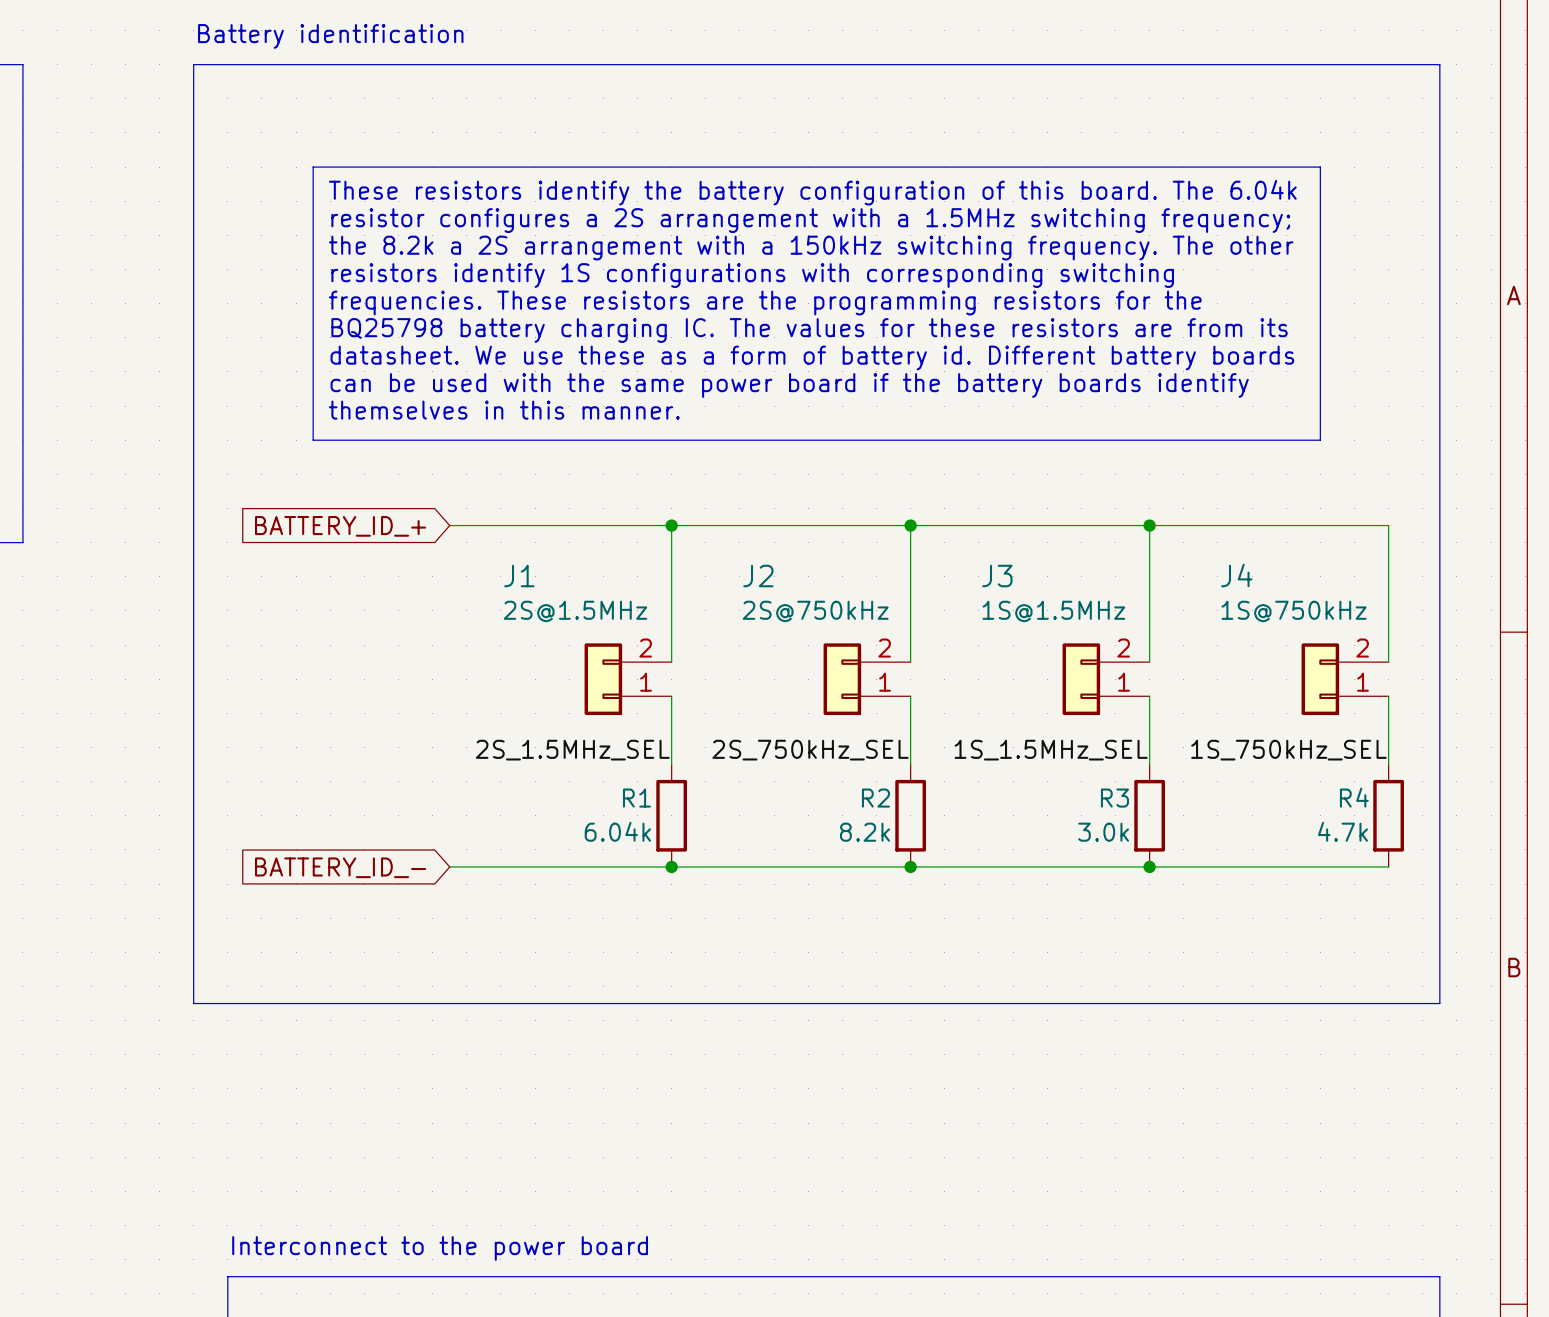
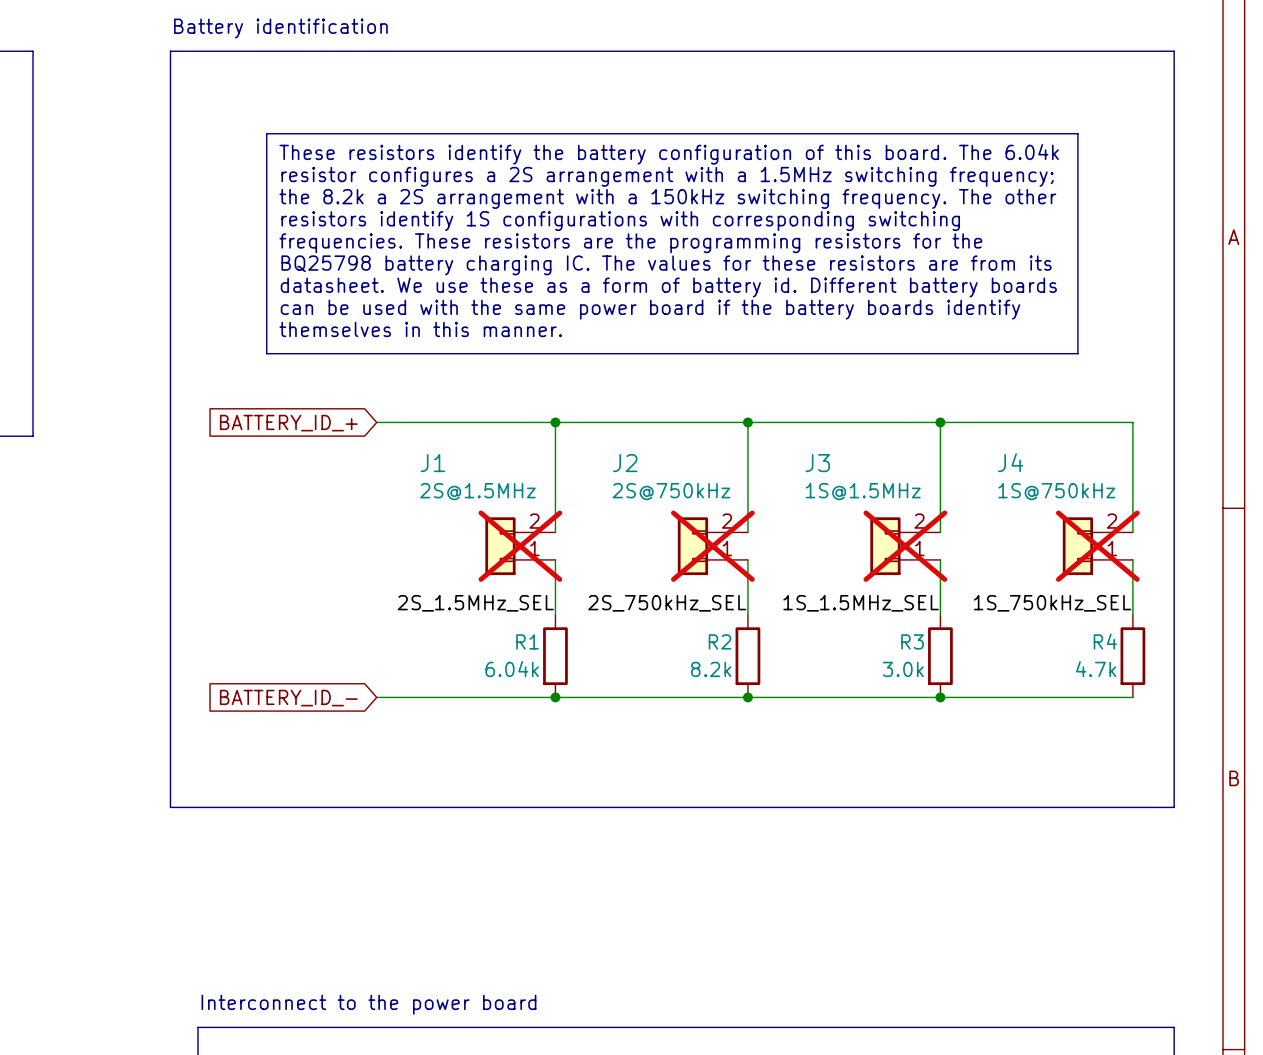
J1 do-not-place cross: none -> (520, 546)
J2 do-not-place cross: none -> (712, 546)
J3 do-not-place cross: none -> (905, 546)
J4 do-not-place cross: none -> (1097, 546)

